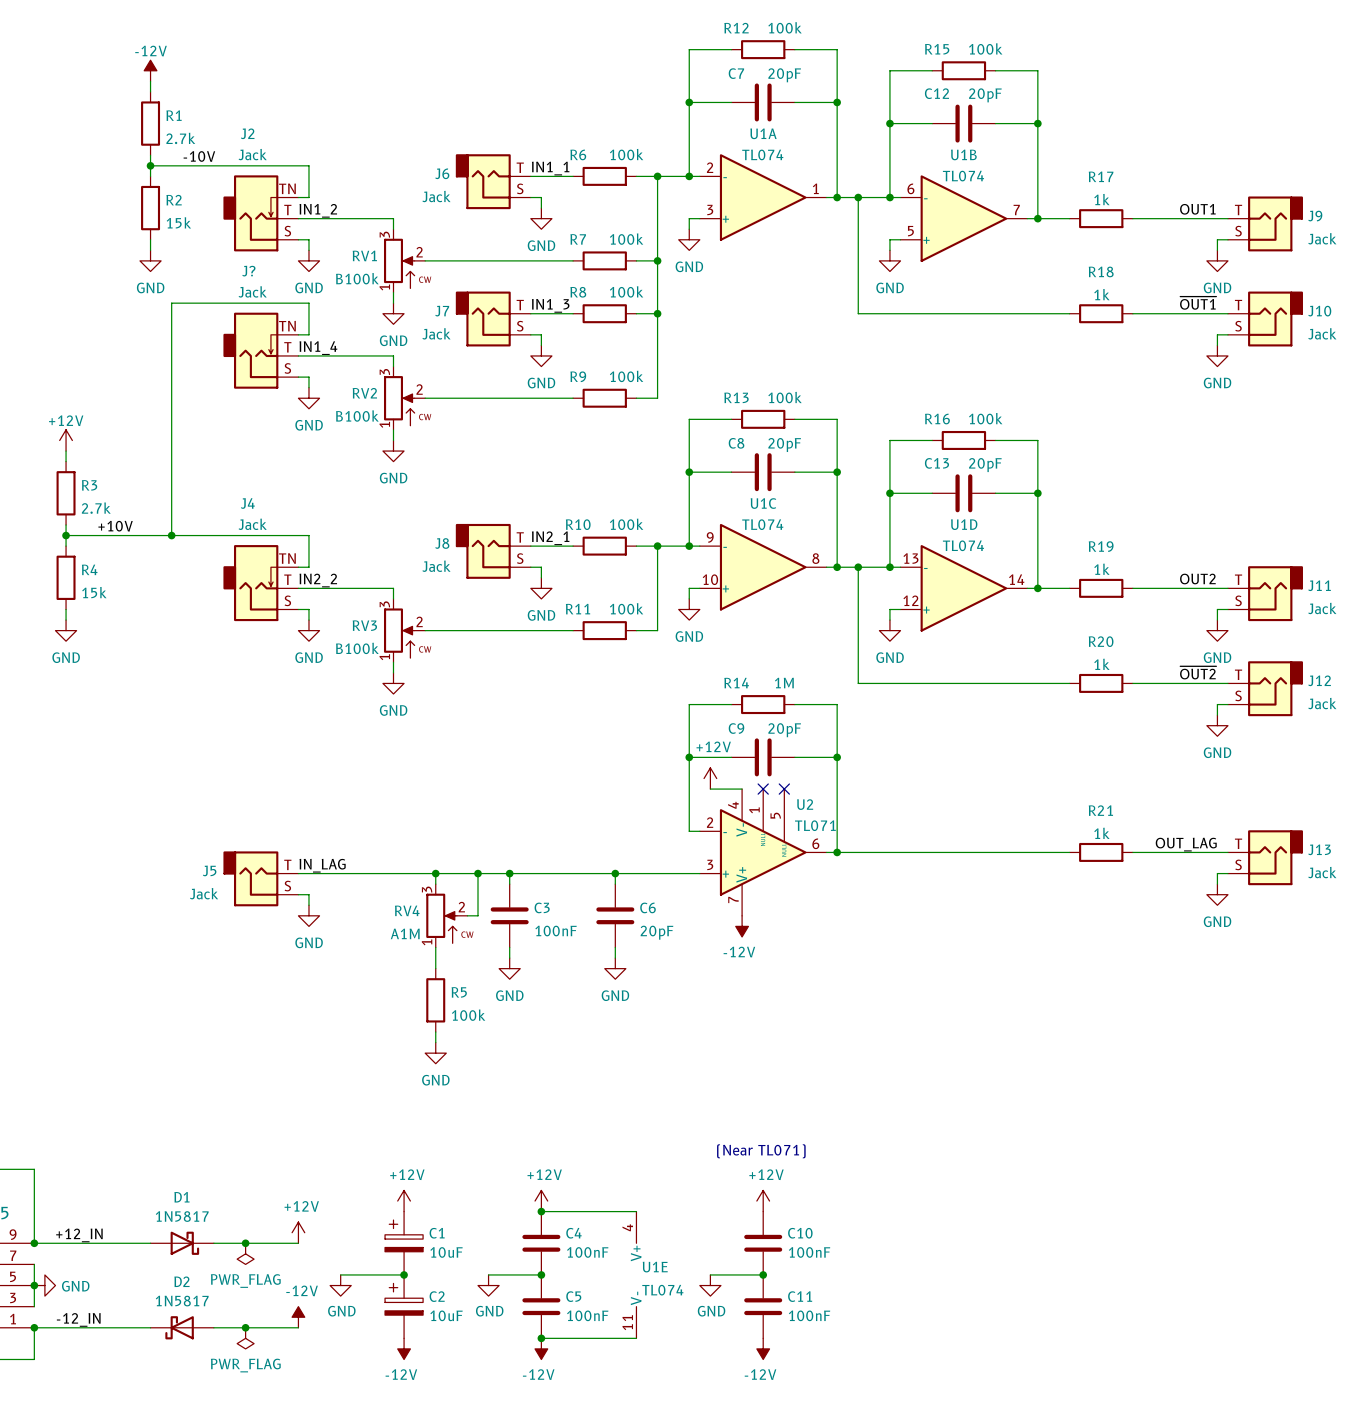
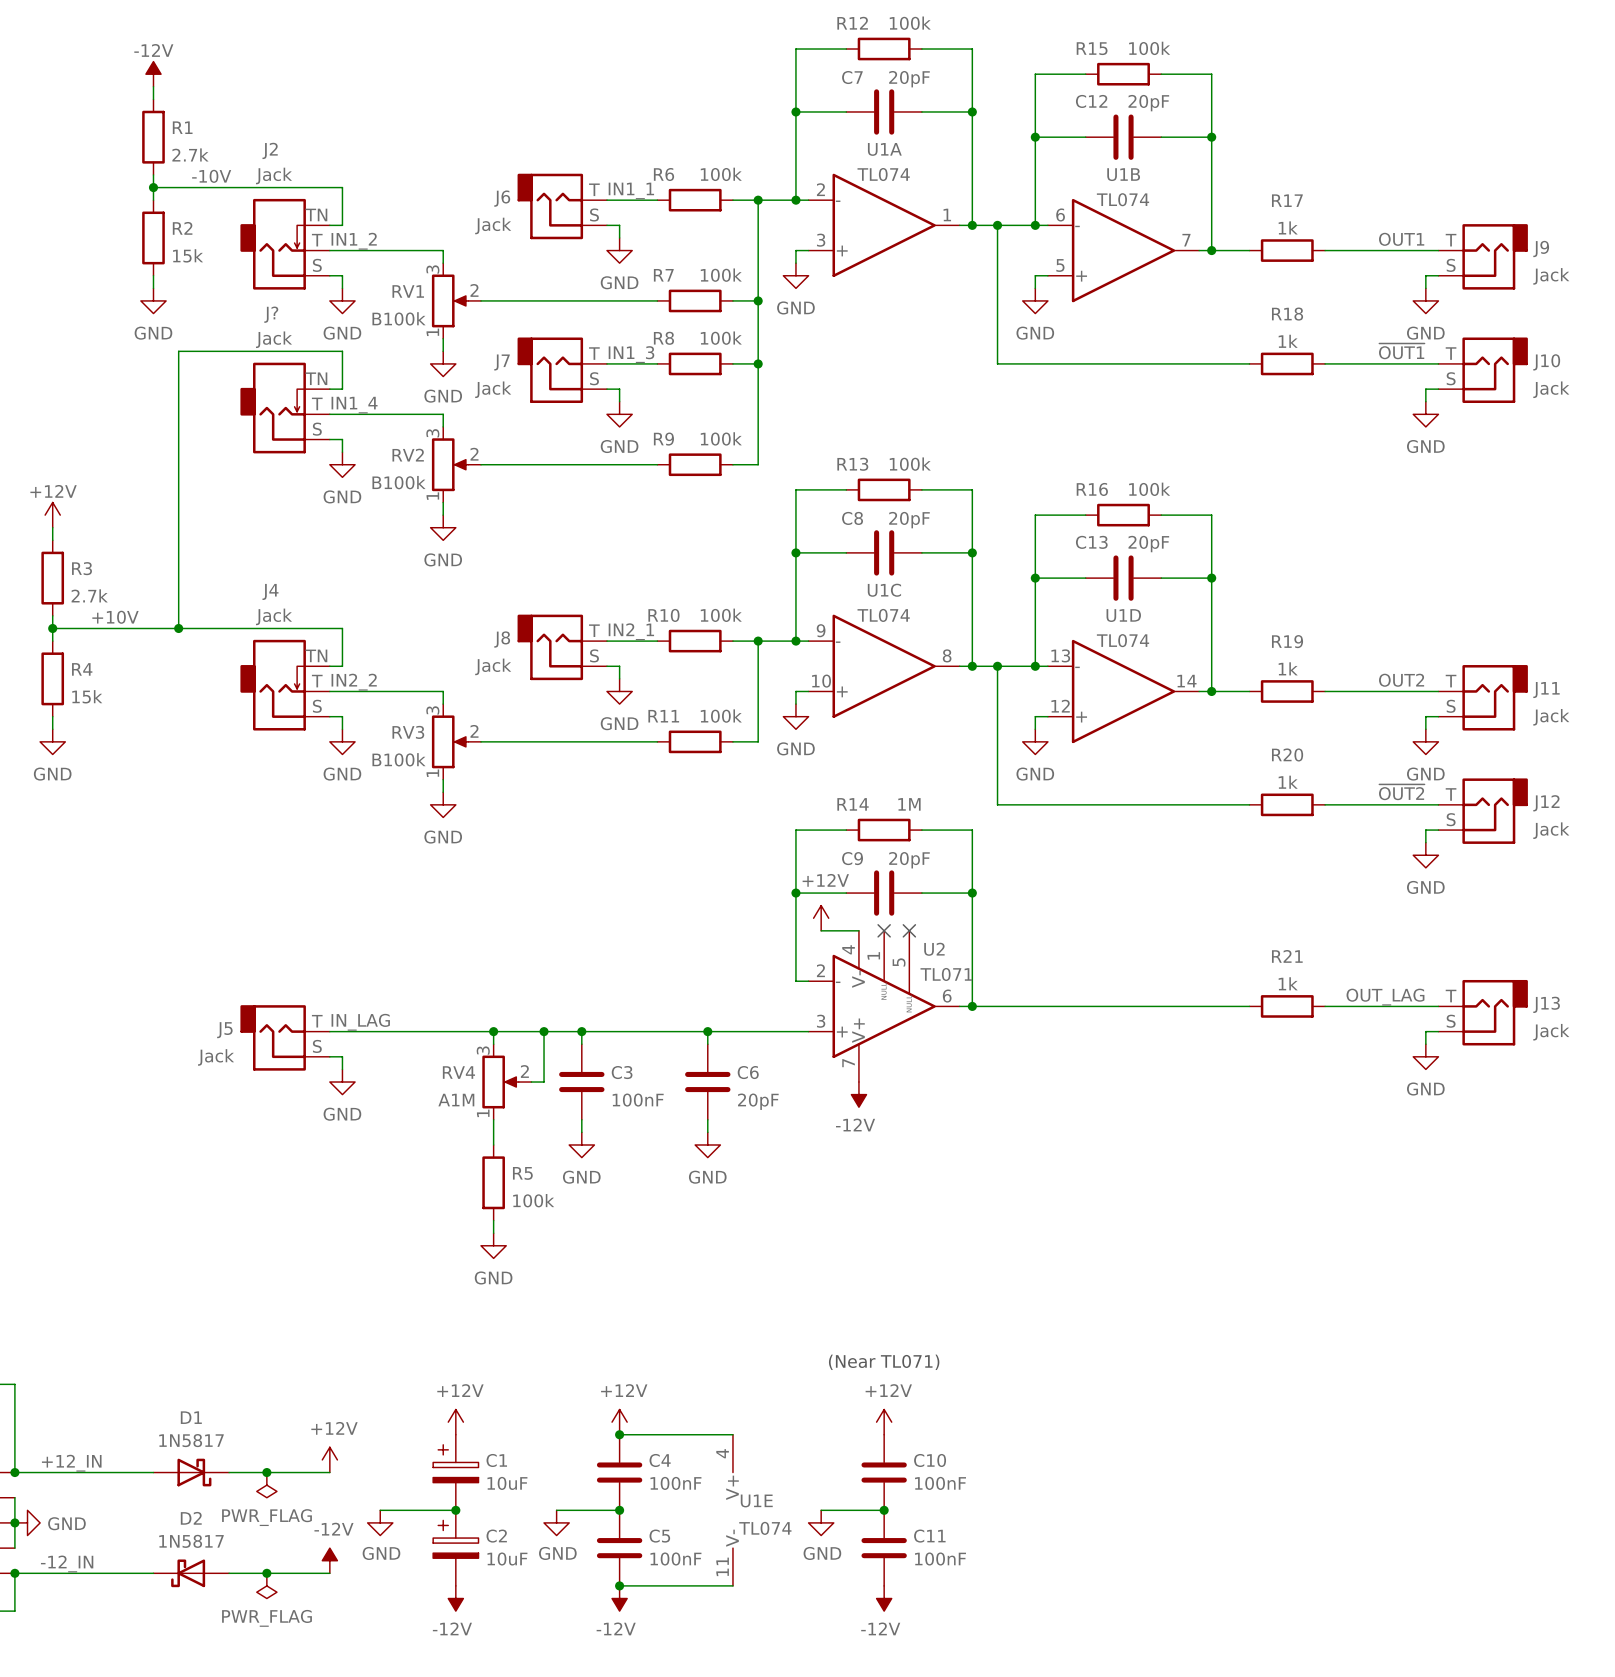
RV1 symbol: [383, 229, 426, 293] -> [431, 263, 482, 339]
RV2 symbol: [383, 366, 426, 430] -> [431, 426, 482, 503]
RV3 symbol: [383, 598, 426, 663] -> [431, 704, 482, 780]
RV4 symbol: [426, 884, 468, 948] -> [482, 1044, 532, 1120]

